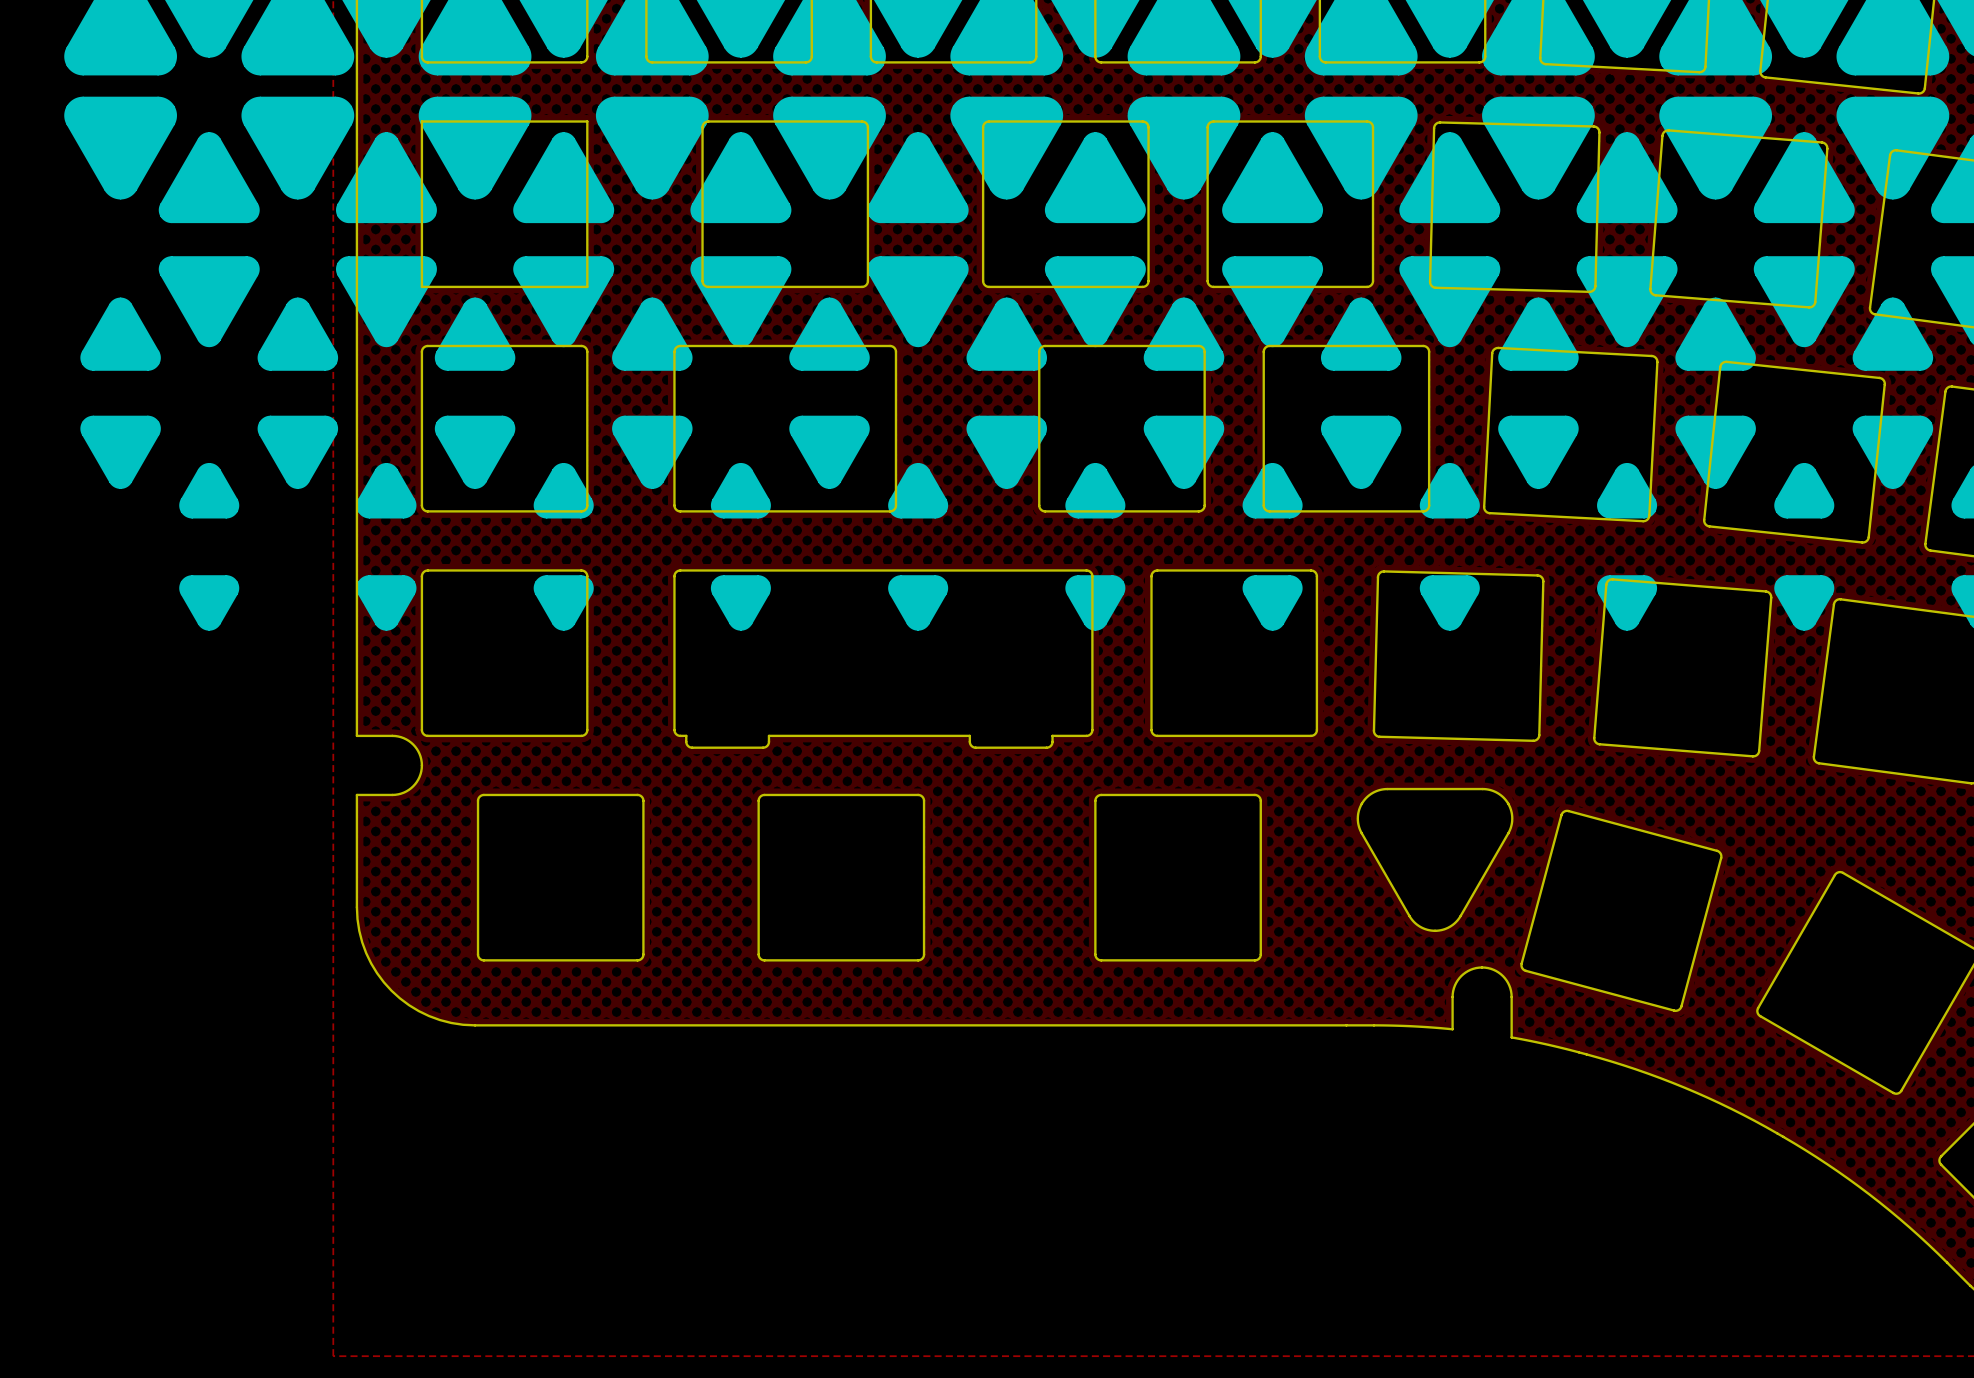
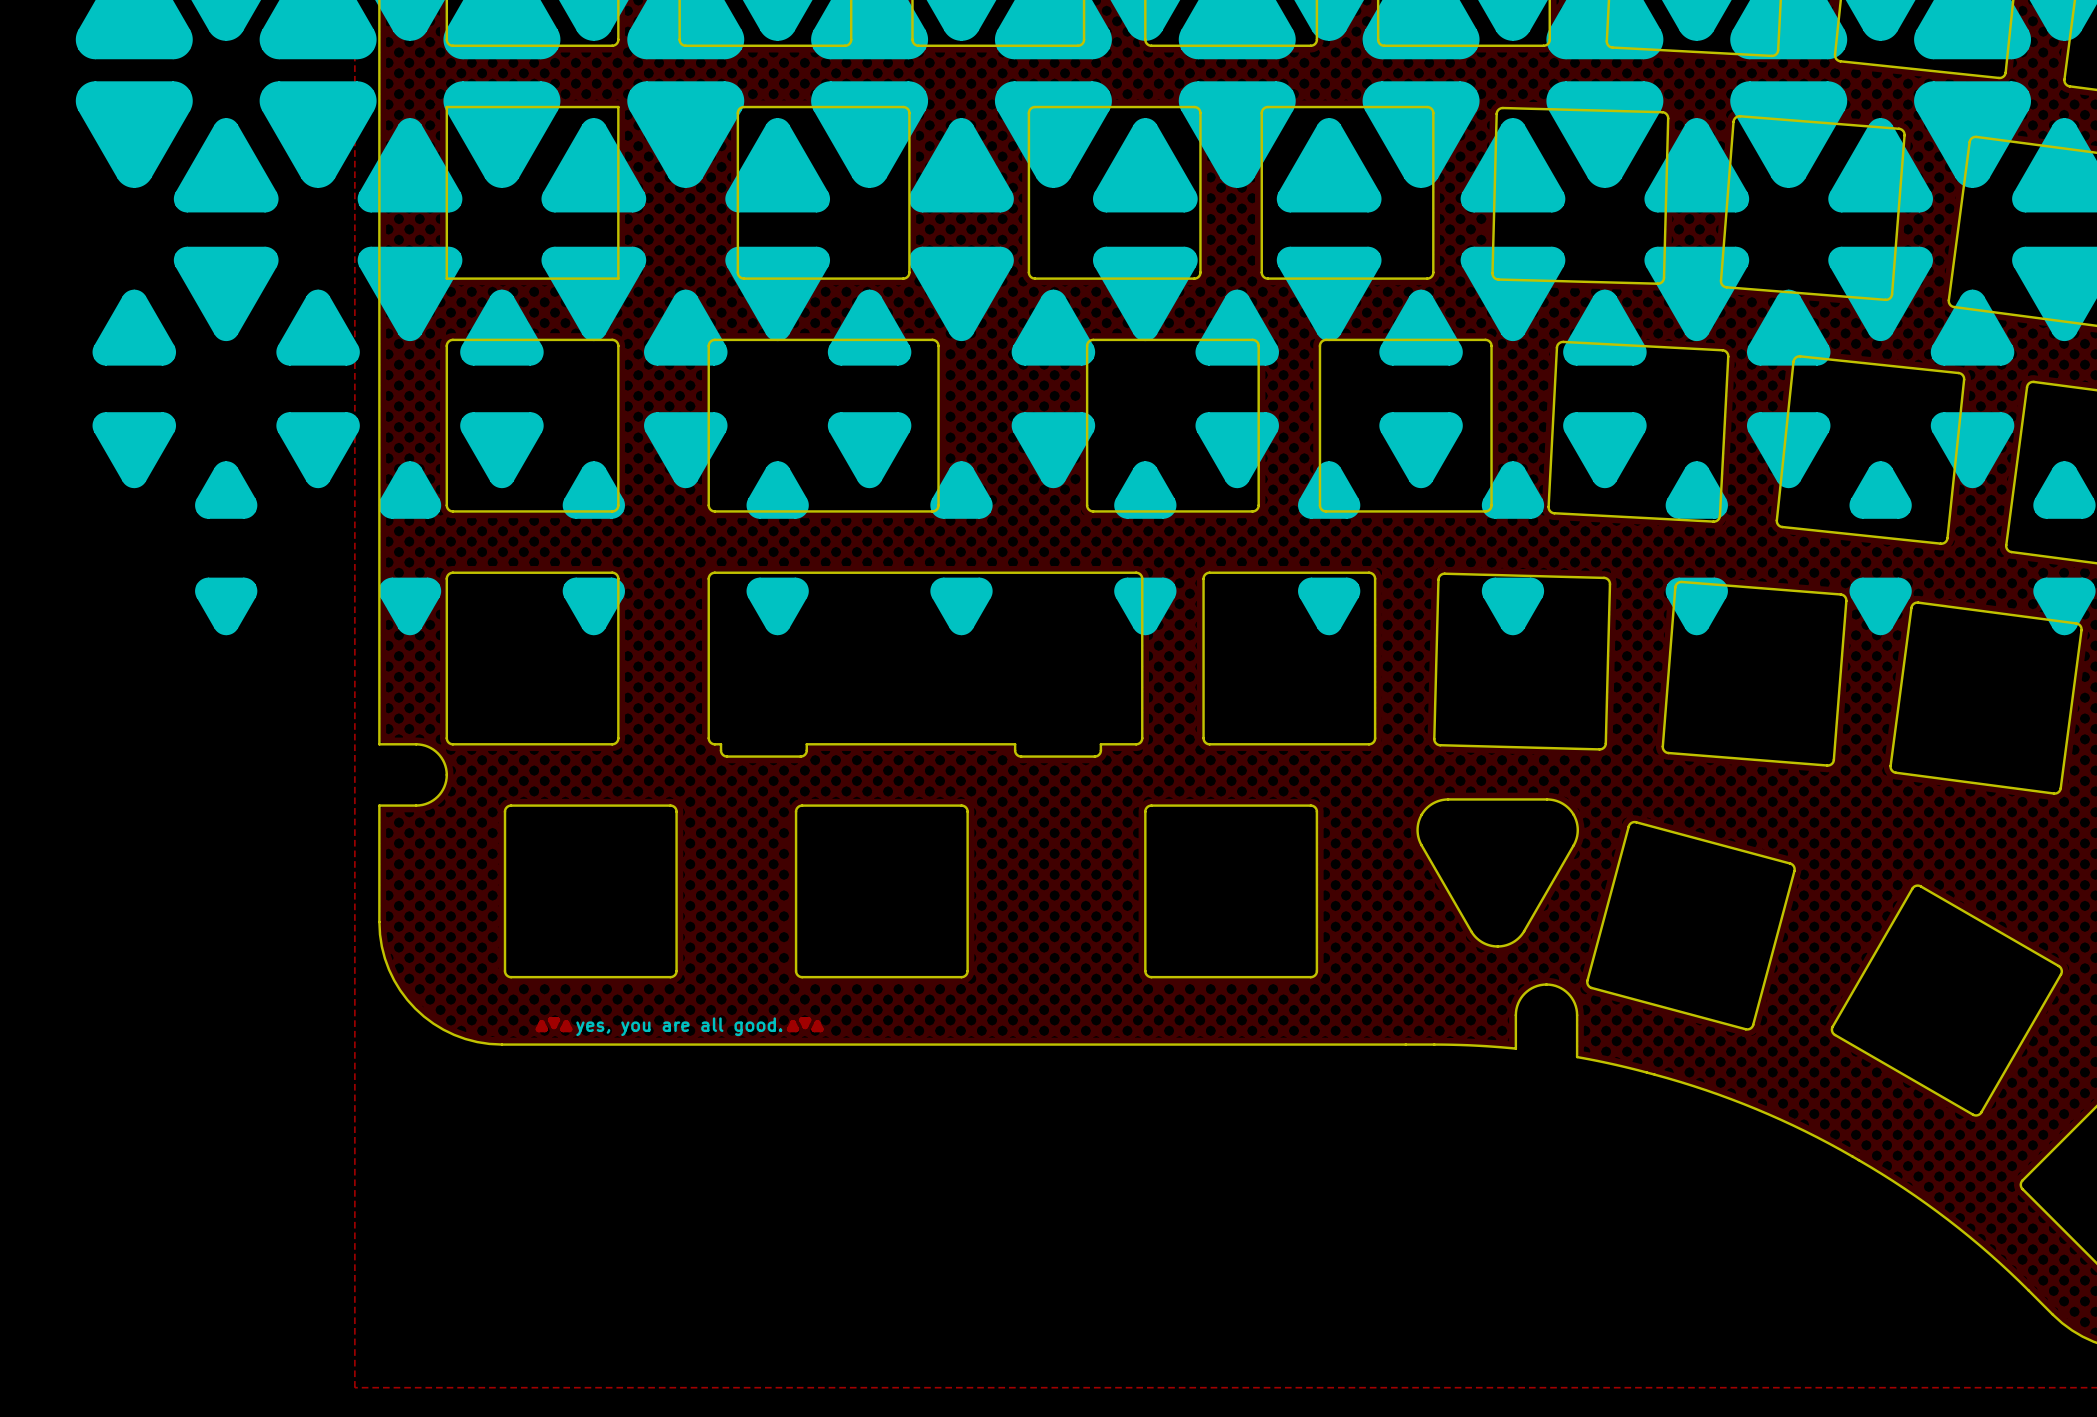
track: none -> (550, 1020) (557, 1020) (554, 1026) (550, 1020)
track: none -> (802, 1020) (808, 1020) (805, 1026) (802, 1020)
track: none -> (541, 1023) (538, 1029) (544, 1029) (541, 1023)
track: none -> (566, 1023) (563, 1029) (569, 1029) (566, 1023)
track: none -> (792, 1023) (789, 1029) (796, 1029) (792, 1023)
track: none -> (817, 1023) (814, 1029) (820, 1029) (817, 1023)
text: none -> yes, you are all good. (679, 1026)

